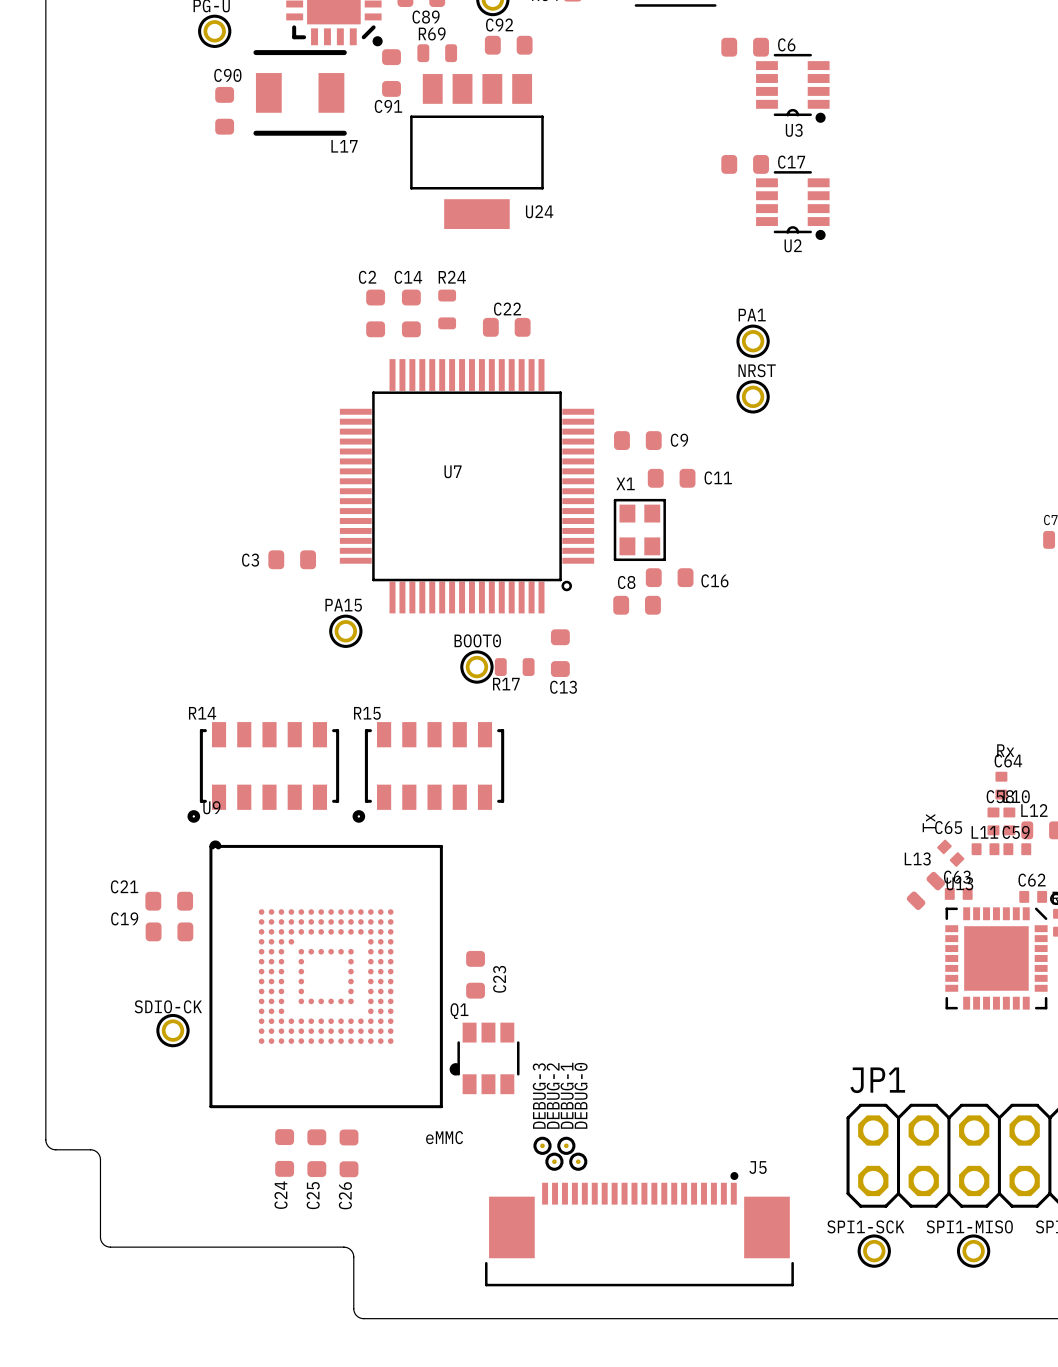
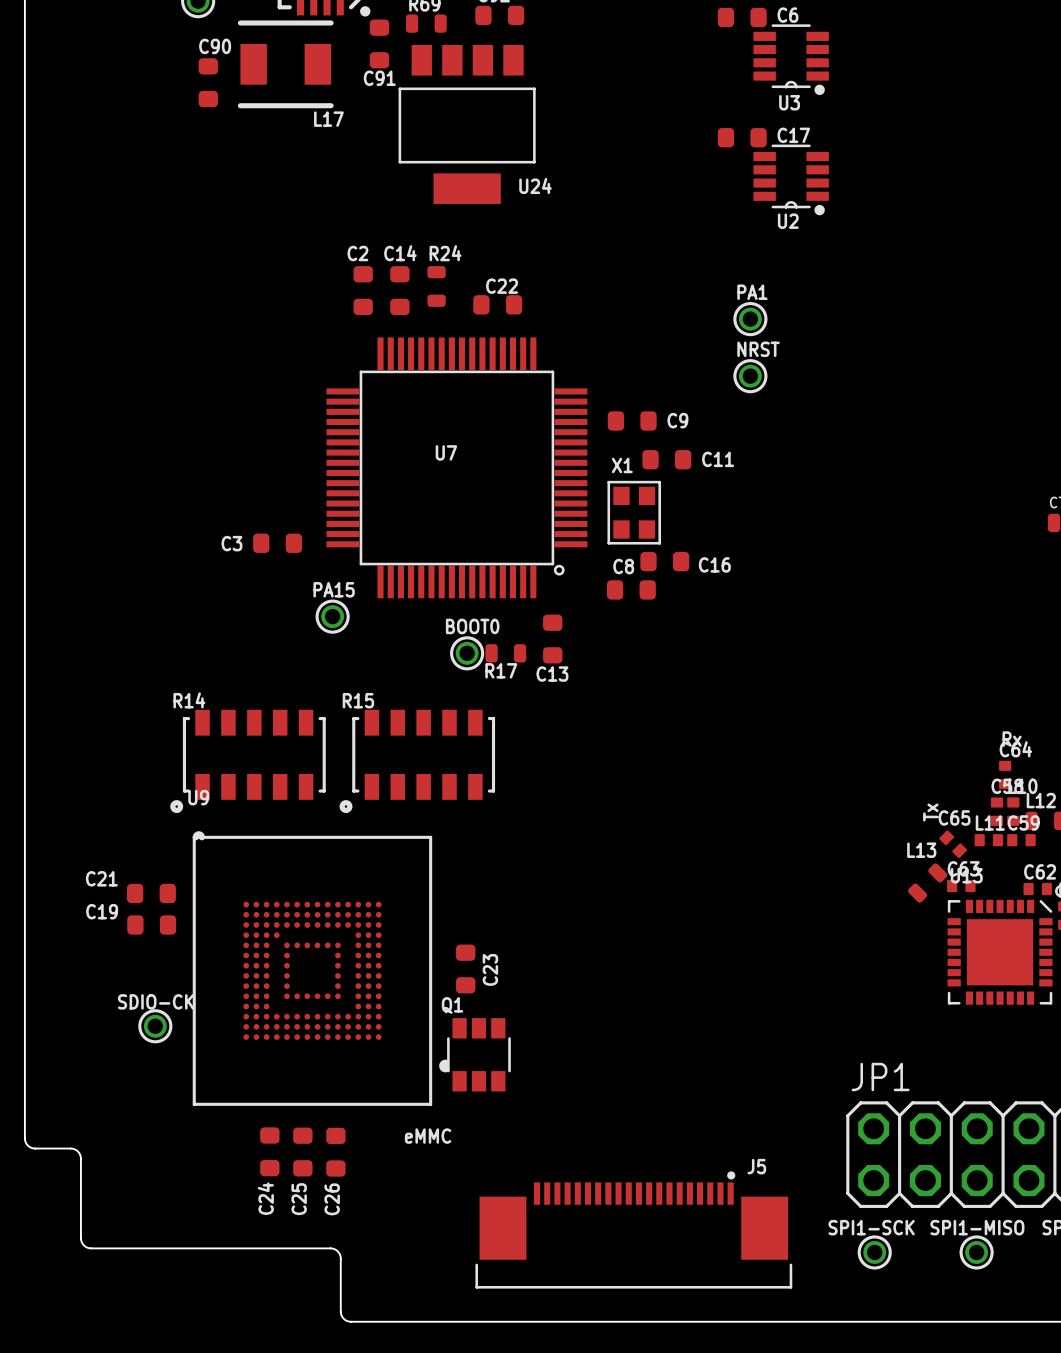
DEBUG-3: (542, 1145) -> none
DEBUG-1: (566, 1145) -> none
DEBUG-2: (554, 1161) -> none
DEBUG-0: (578, 1161) -> none

